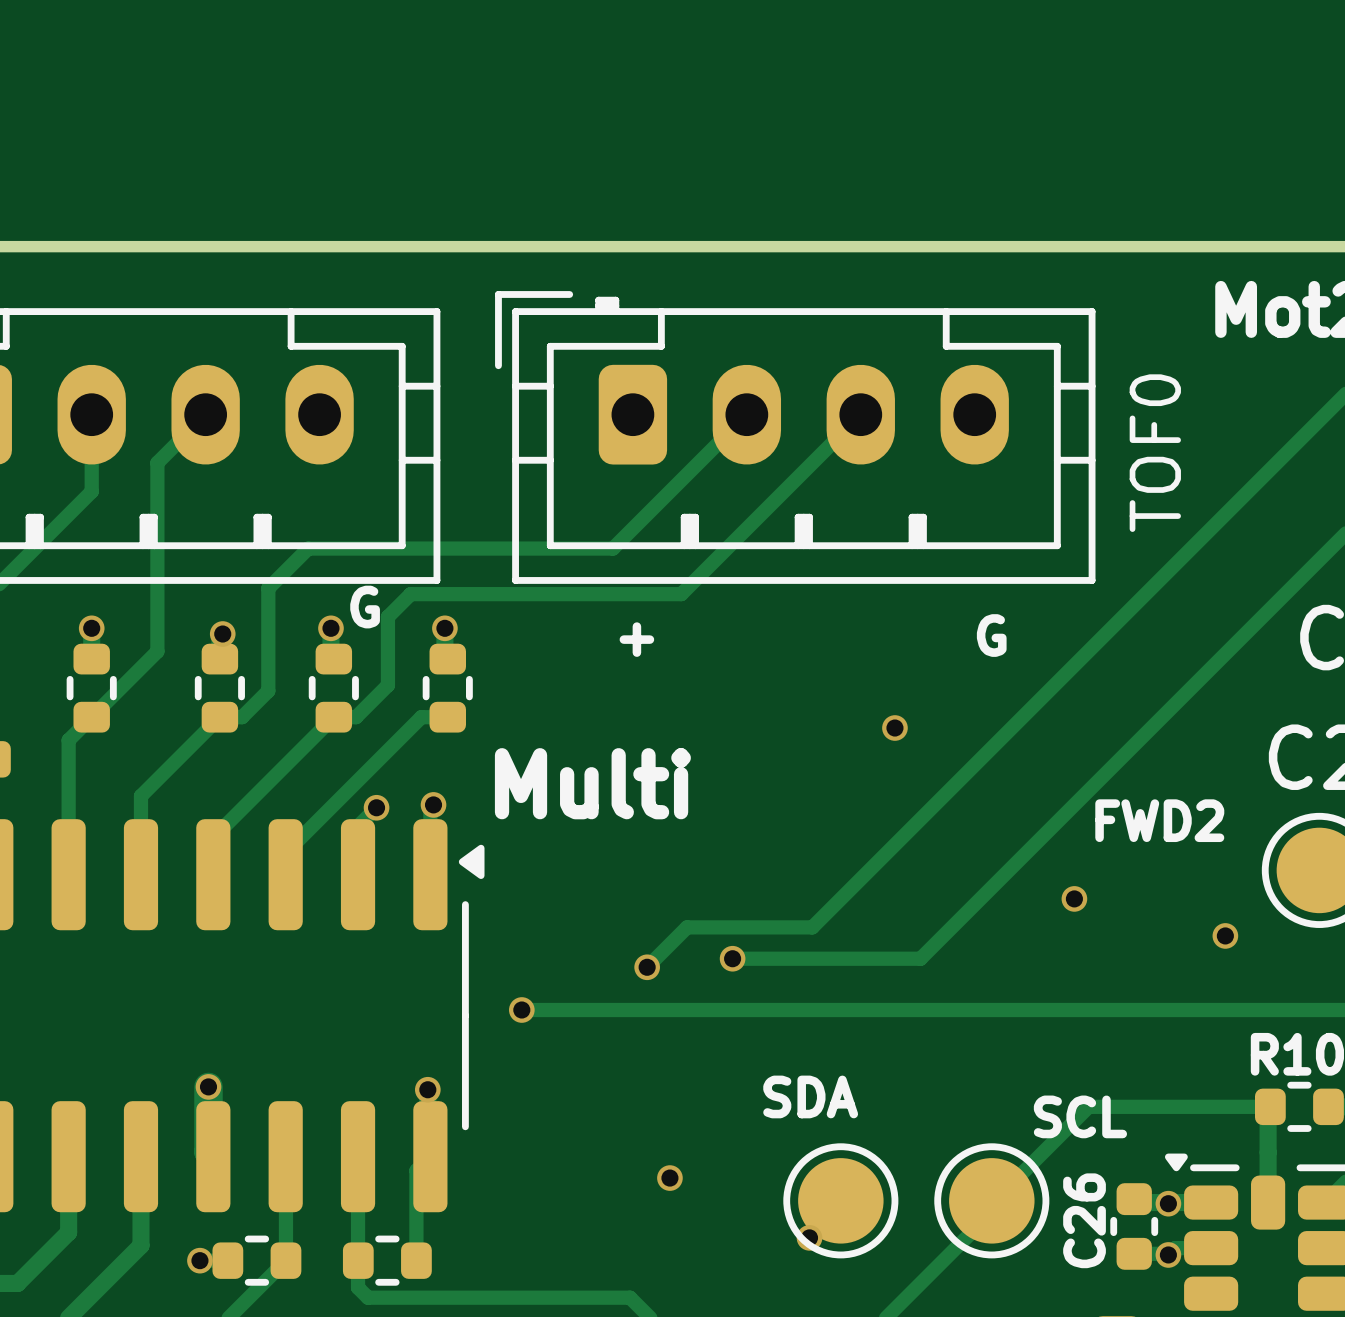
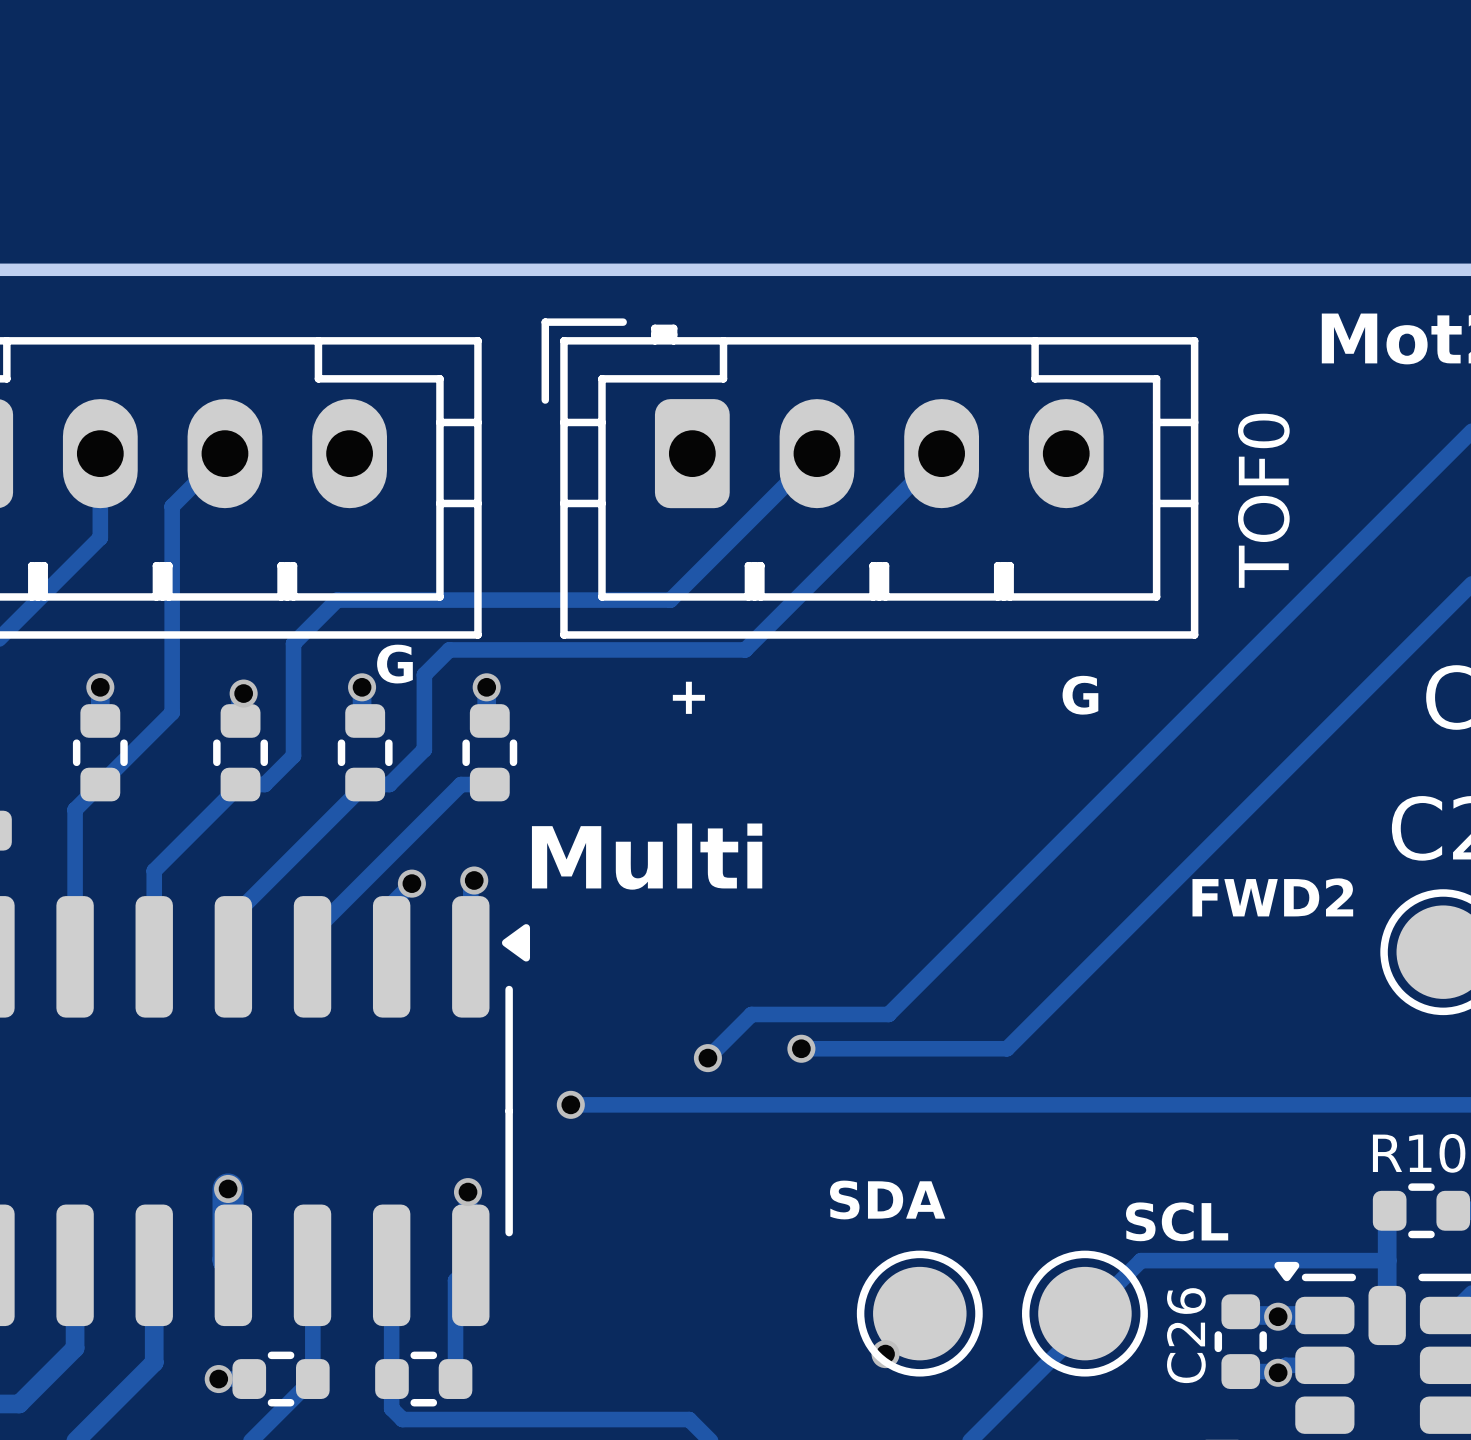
via: (894, 728) -> none
via: (1074, 898) -> none
via: (1225, 935) -> none
track: (1043, 1152) (1088, 1106) (1268, 1106) (1268, 1152) -> (1141, 1260) (1387, 1260)
via: (669, 1178) -> none

